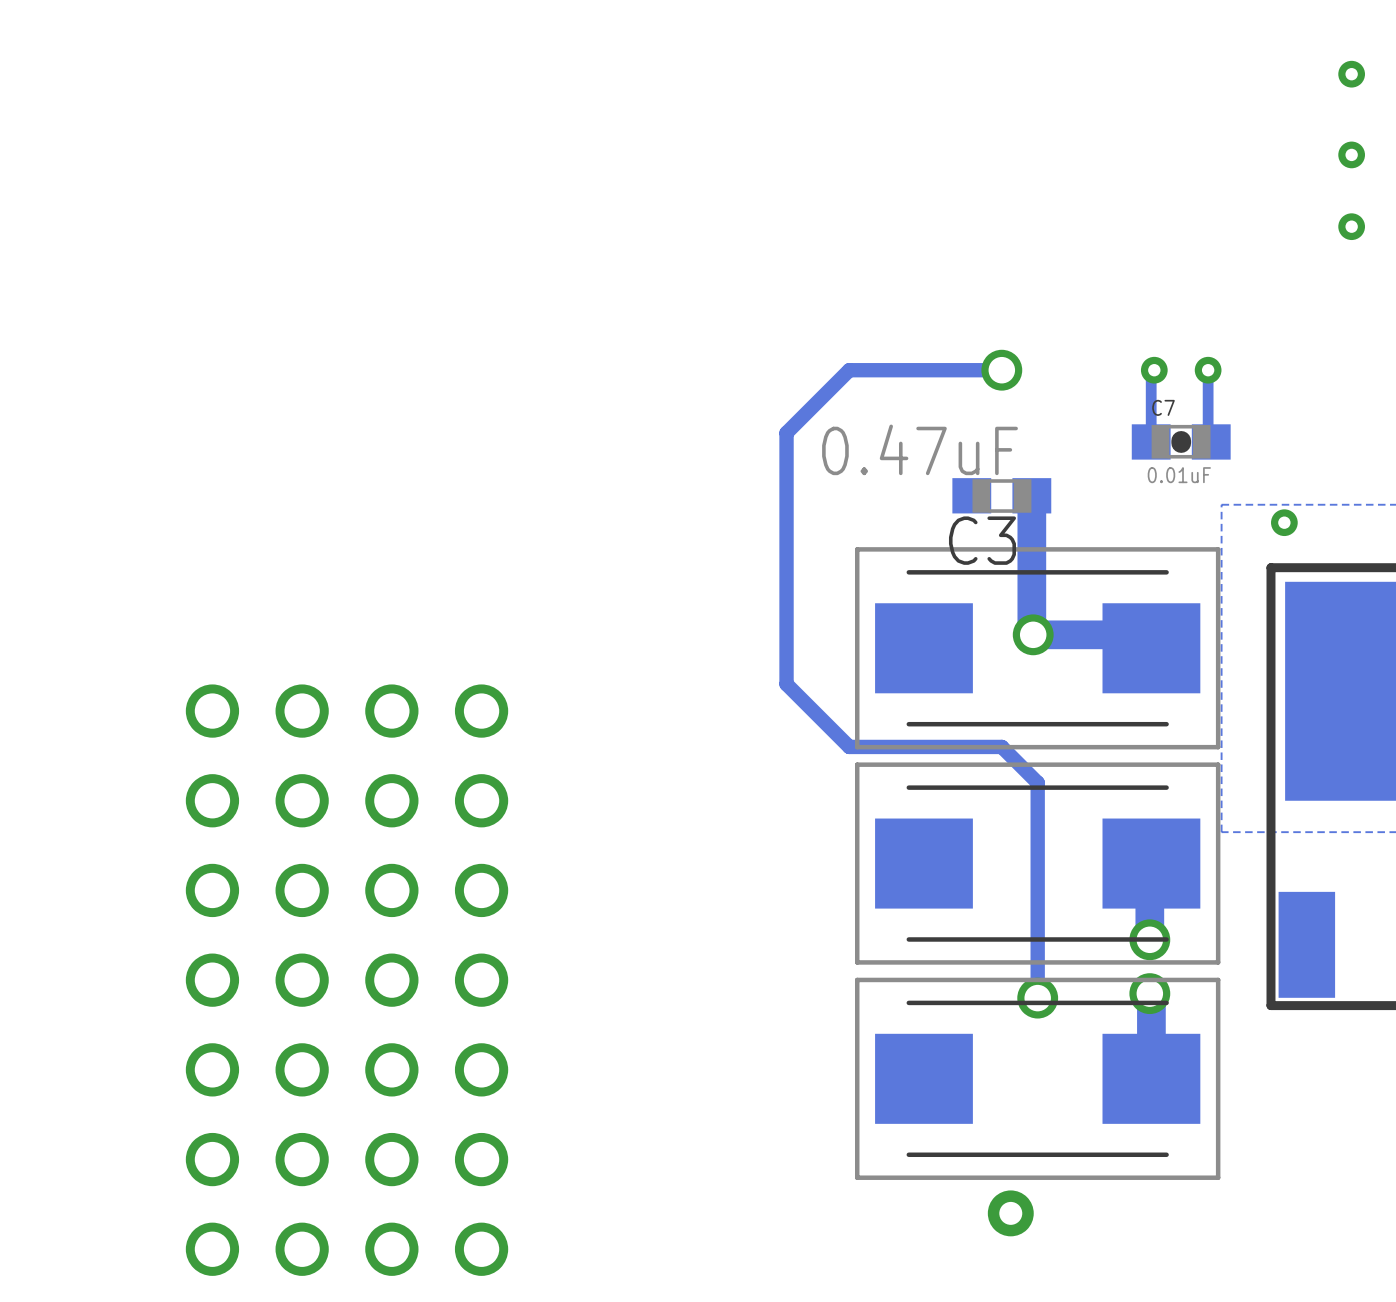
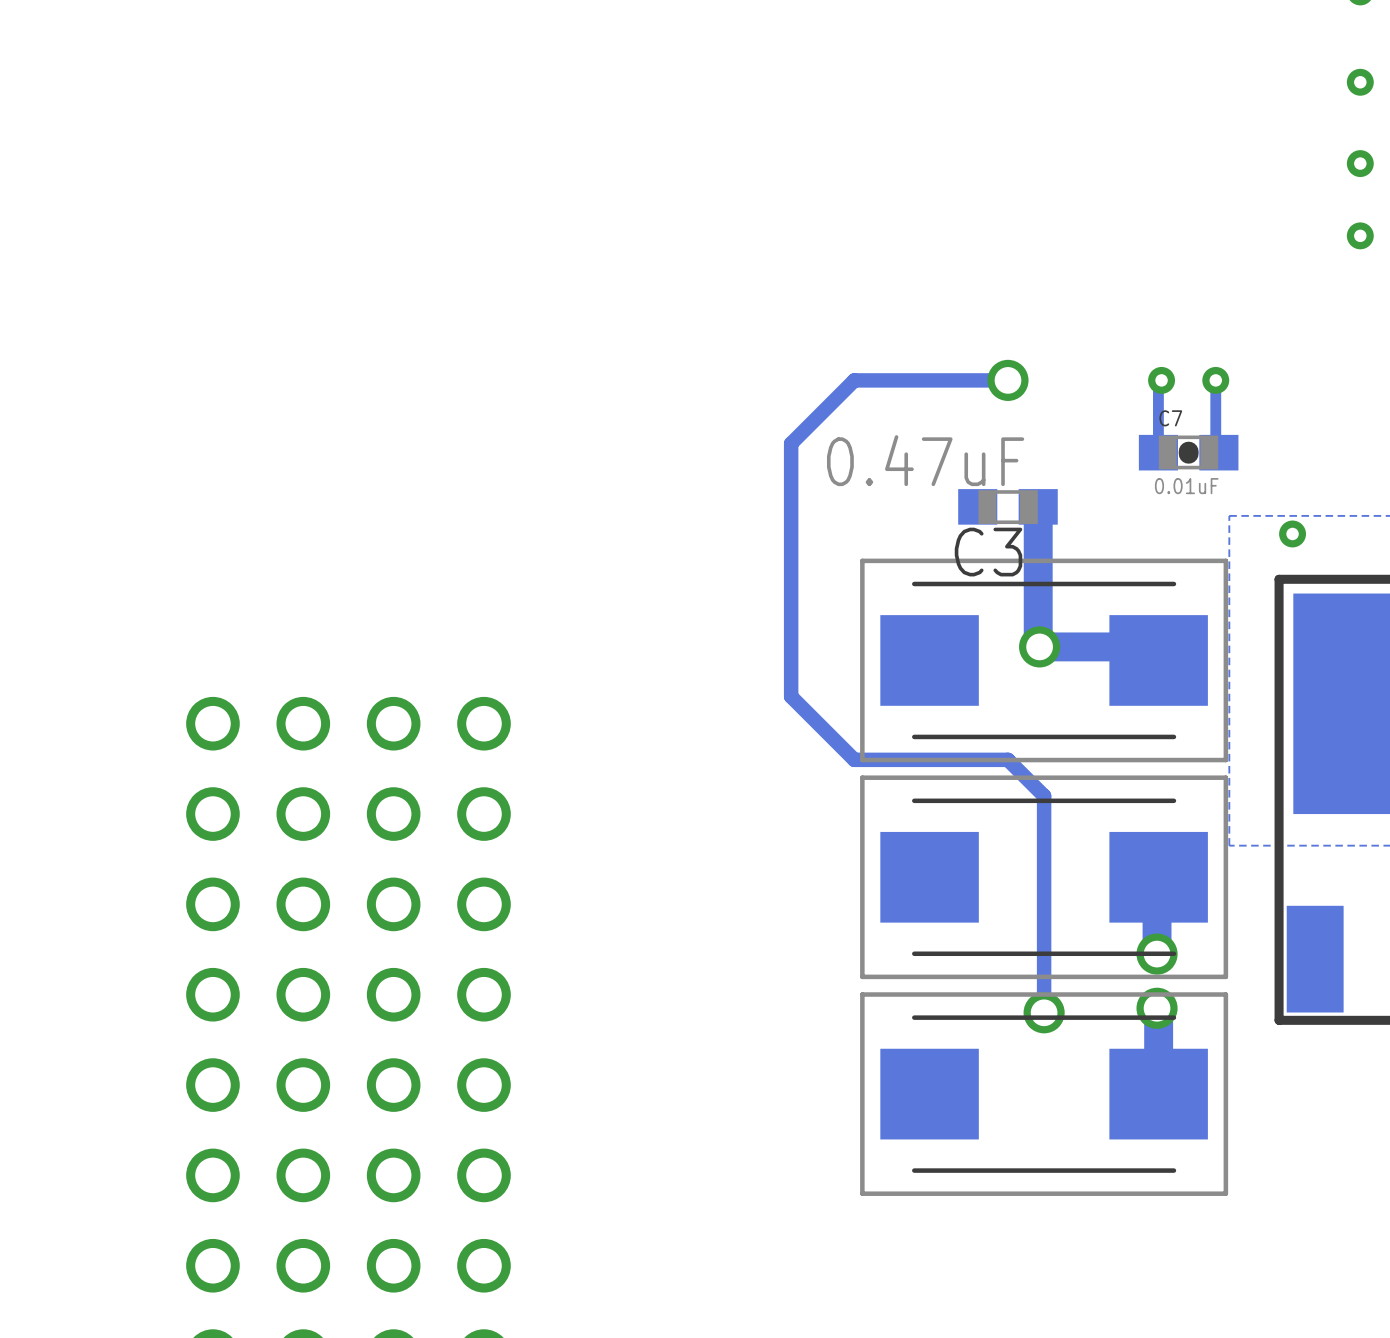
via: (1010, 1213) -> none

